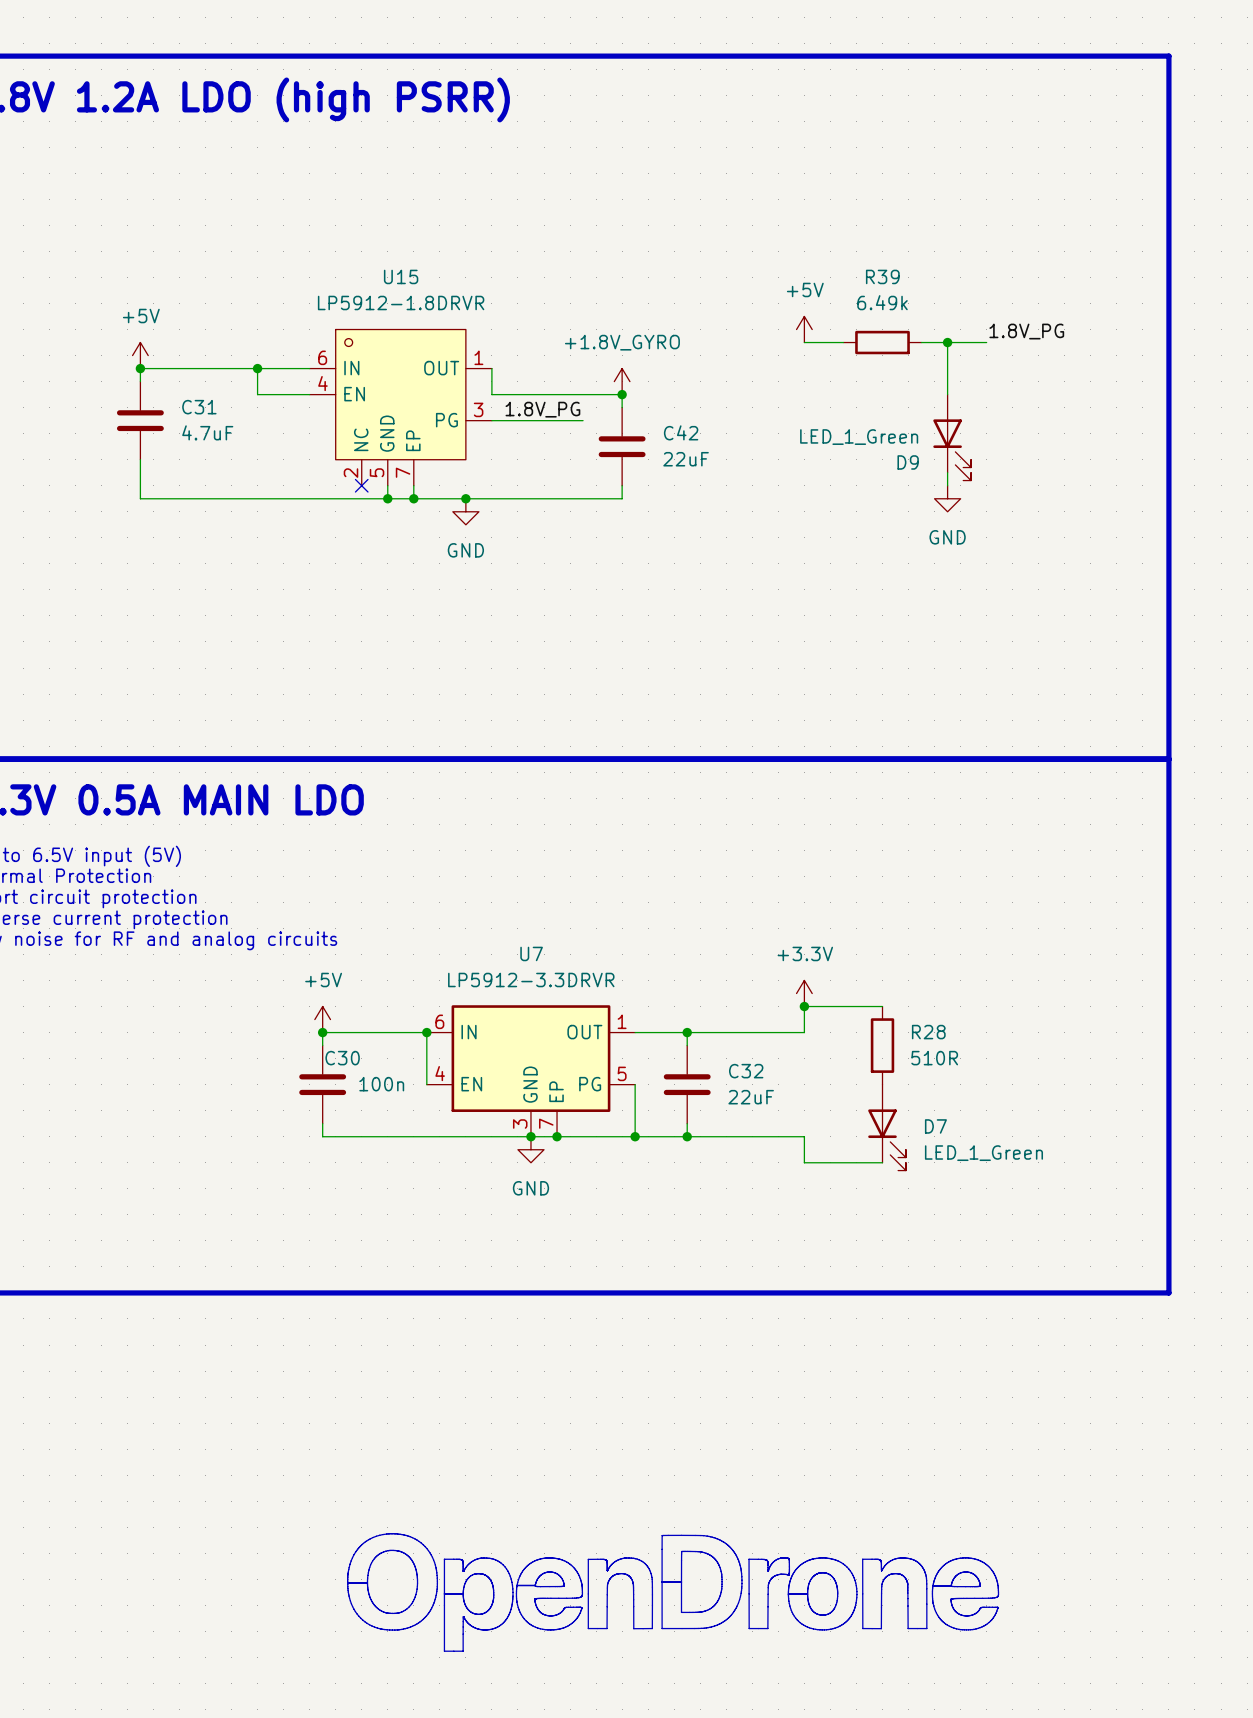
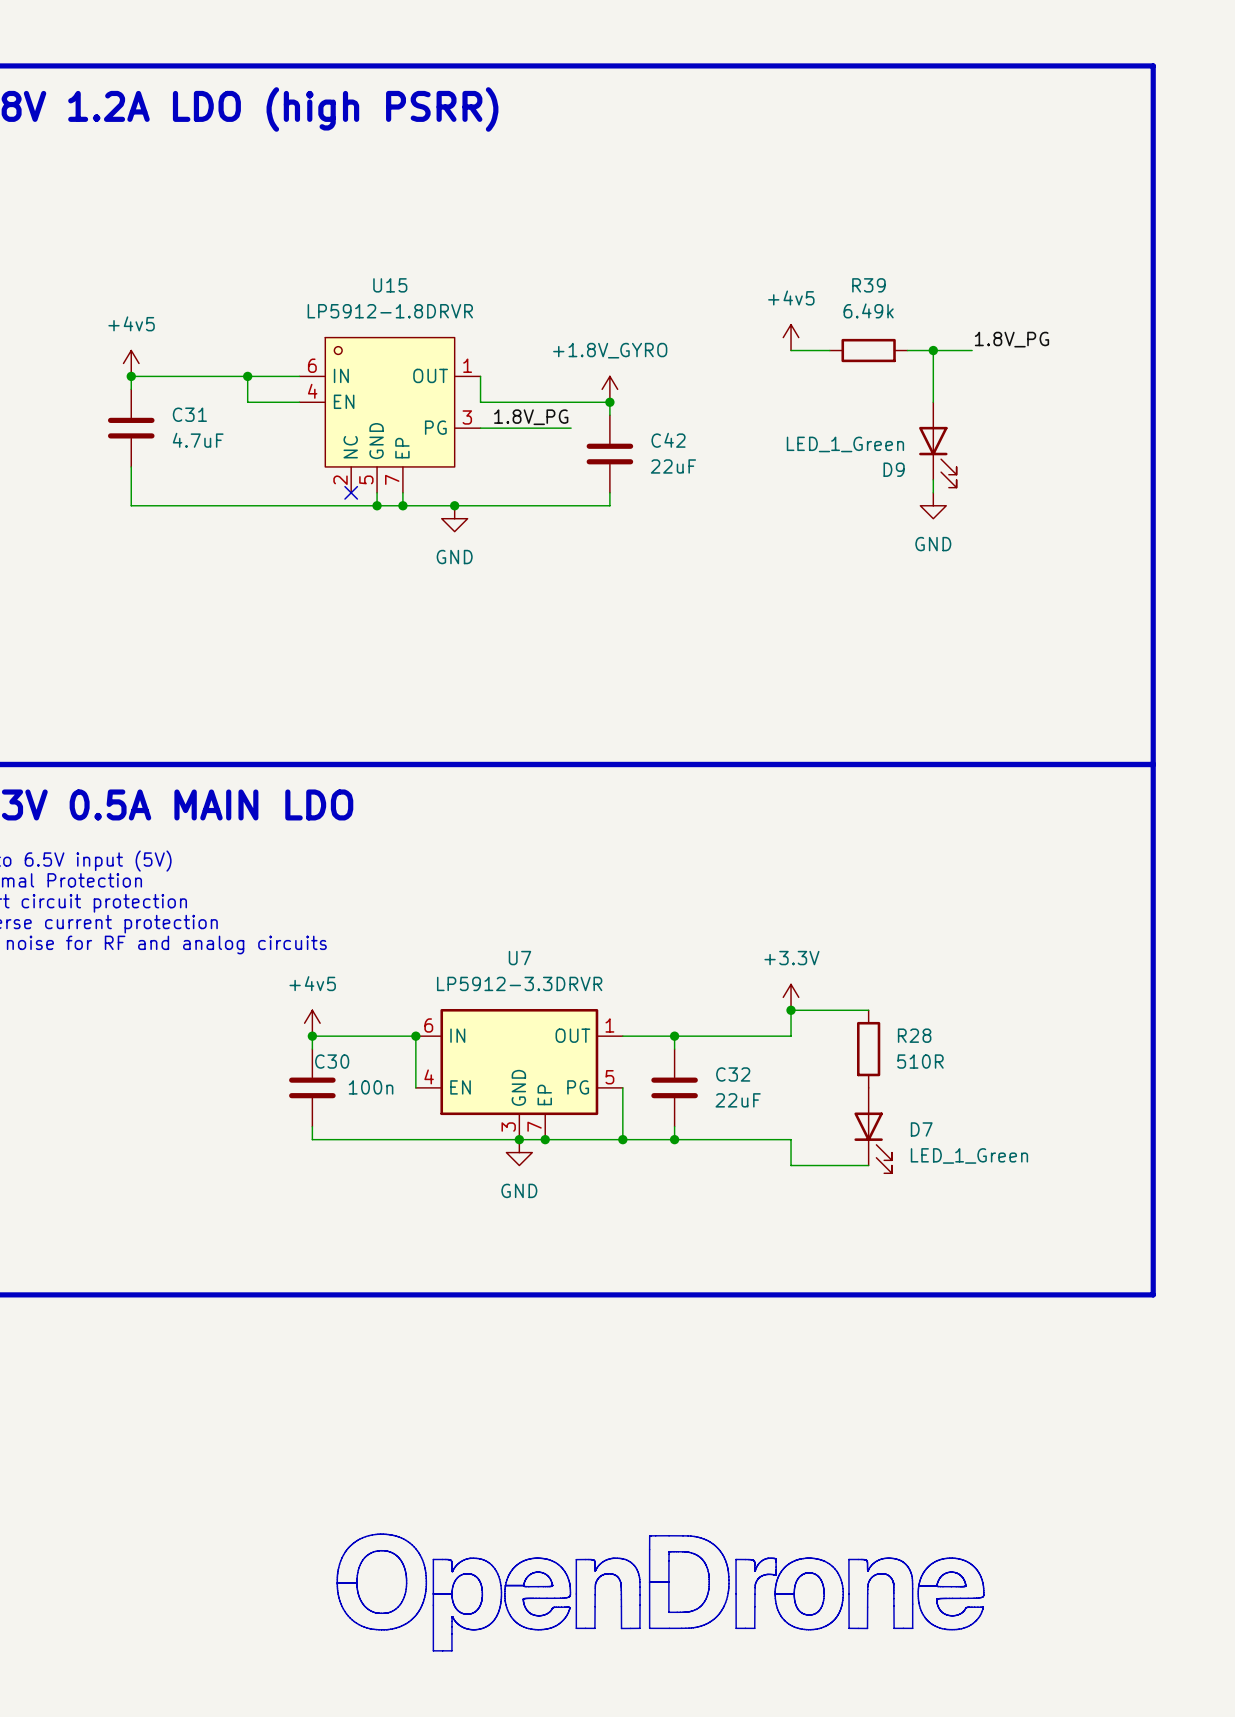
power symbol: +5V (804, 329) -> +4v5 (791, 337)
power symbol: +5V (140, 355) -> +4v5 (131, 363)
power symbol: +5V (322, 1019) -> +4v5 (312, 1023)

